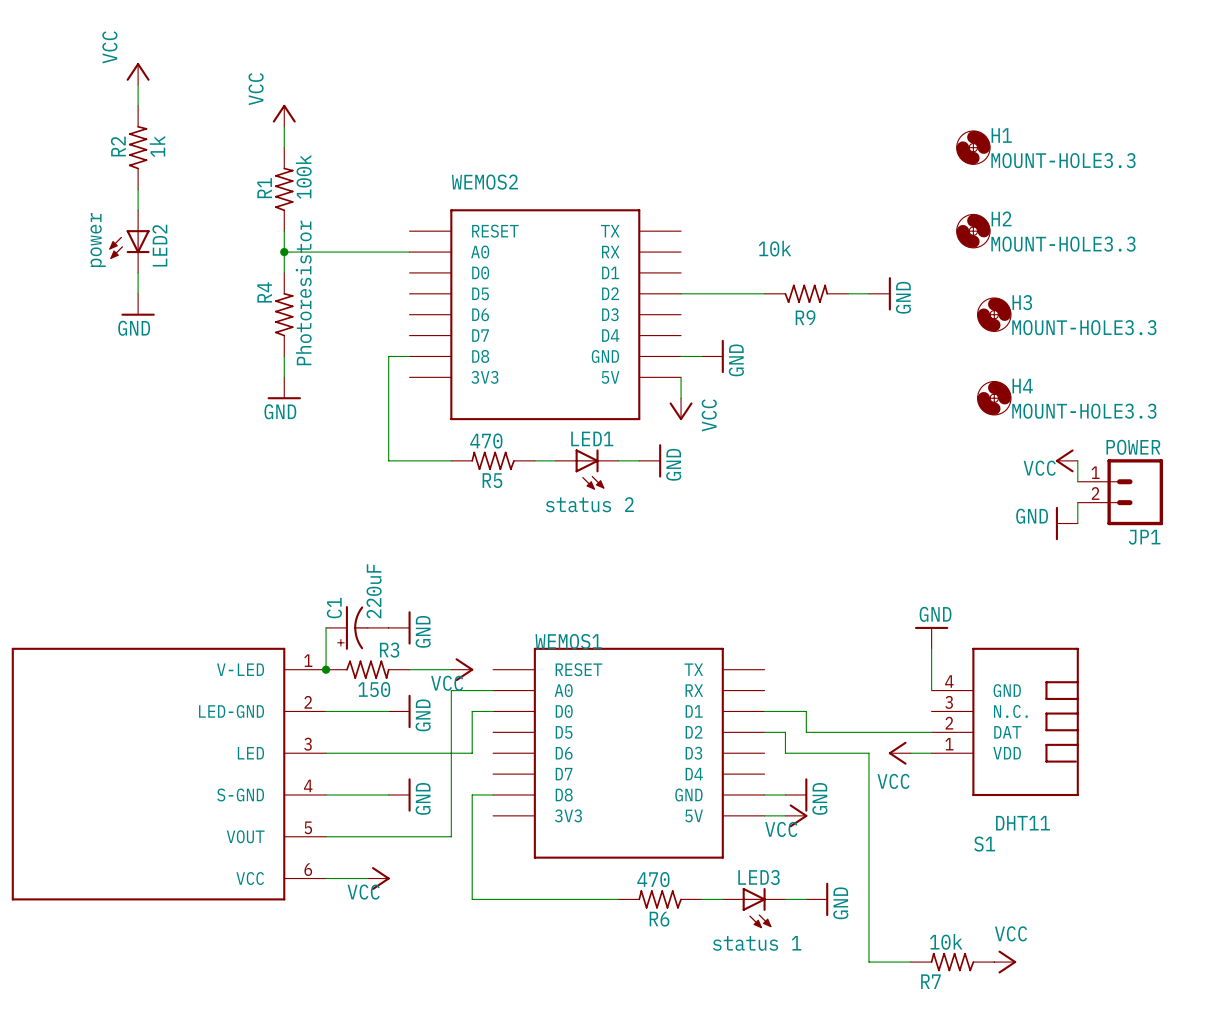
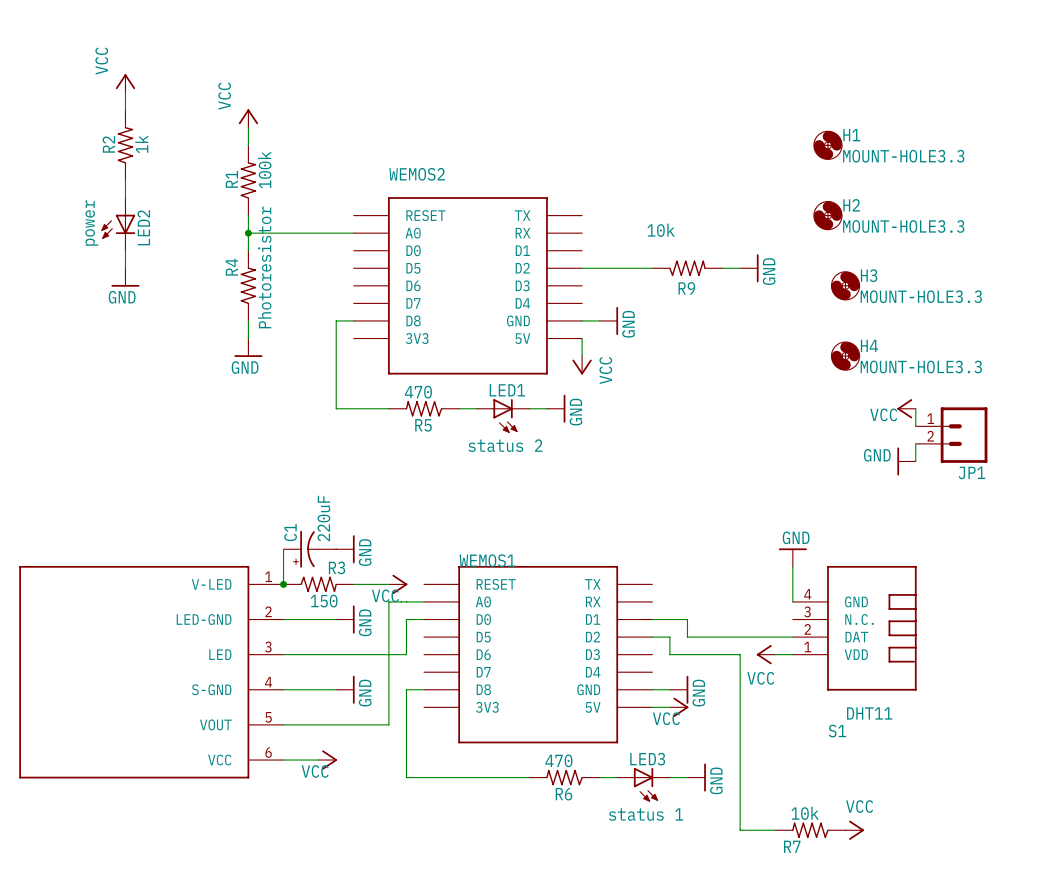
JP1 value: POWER (1133, 447) -> none

